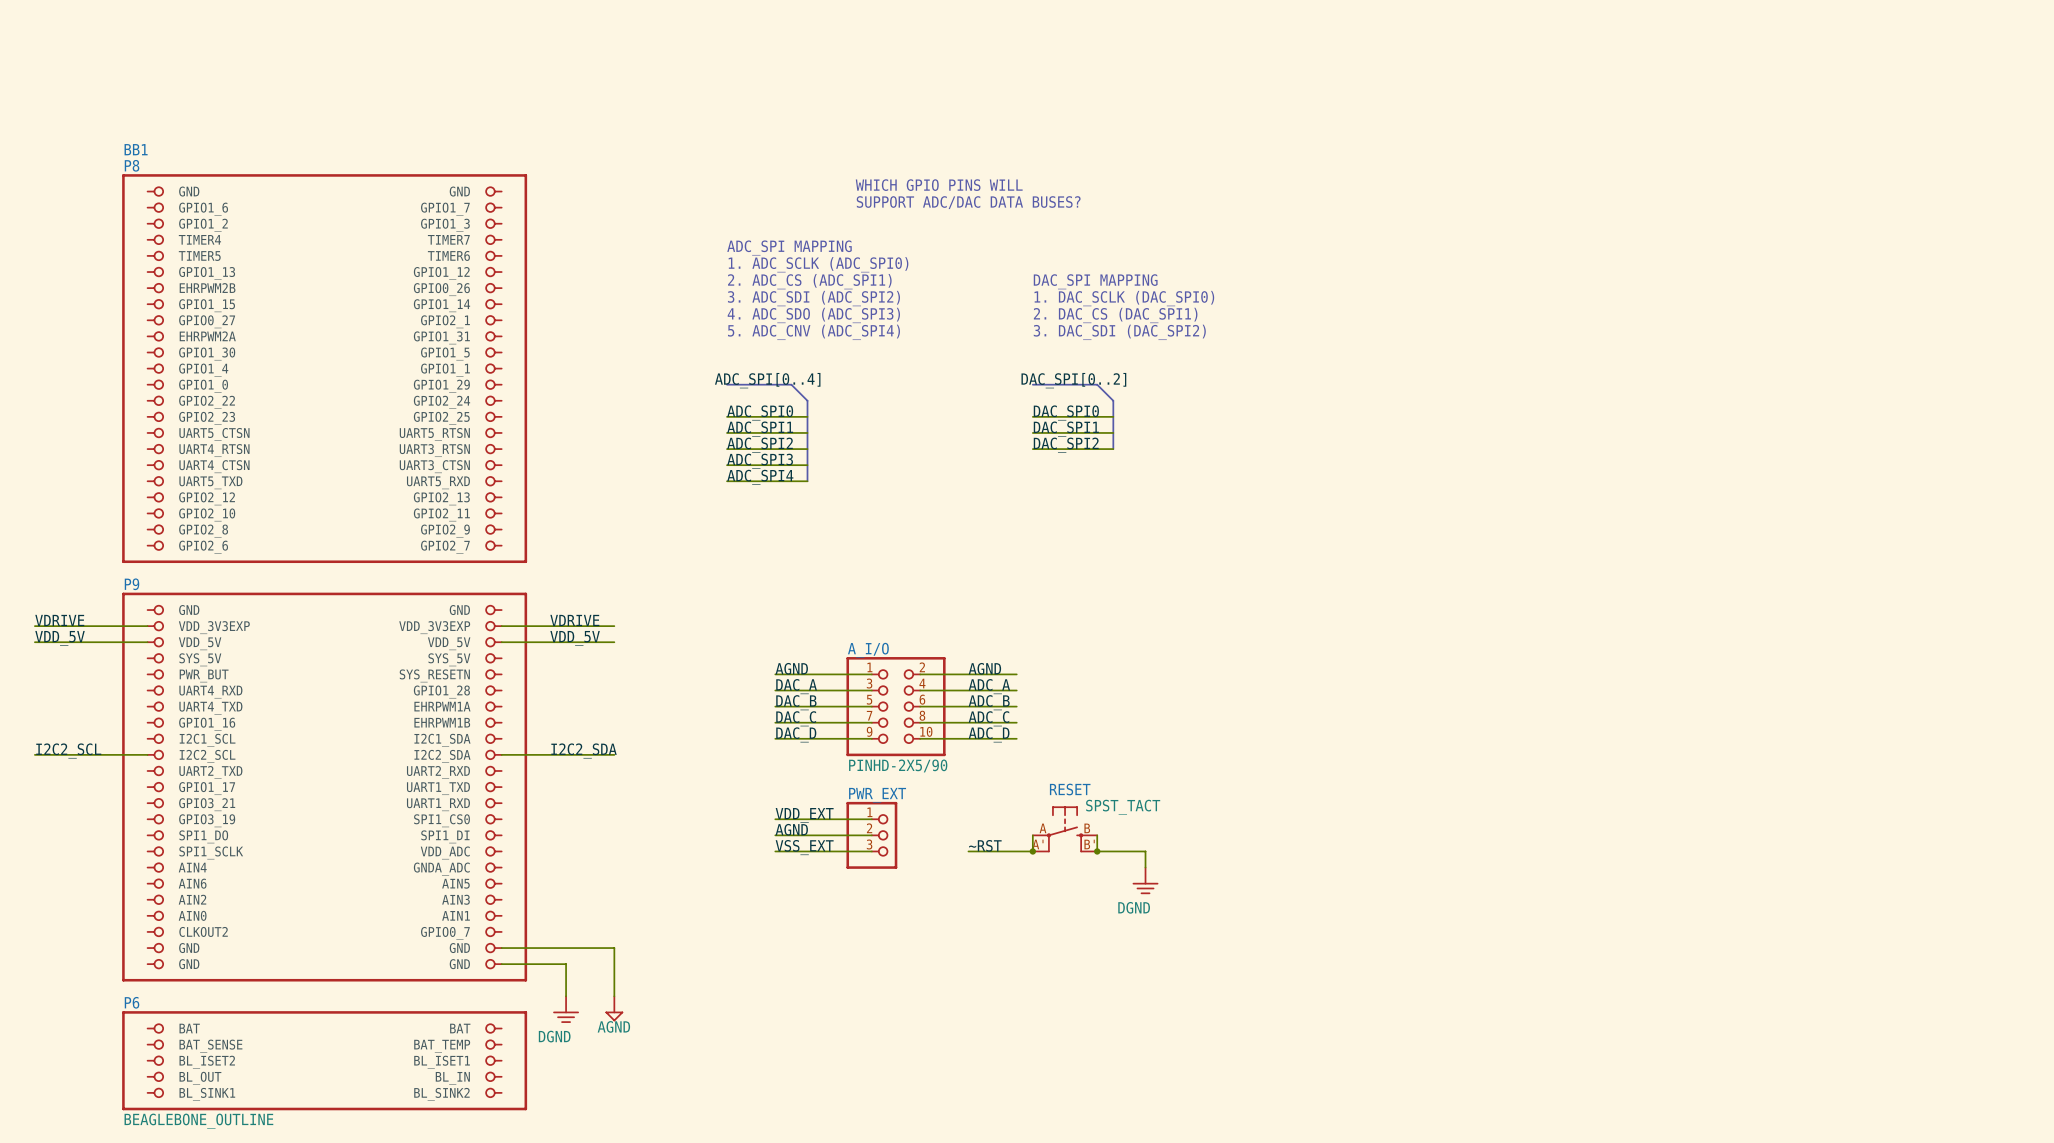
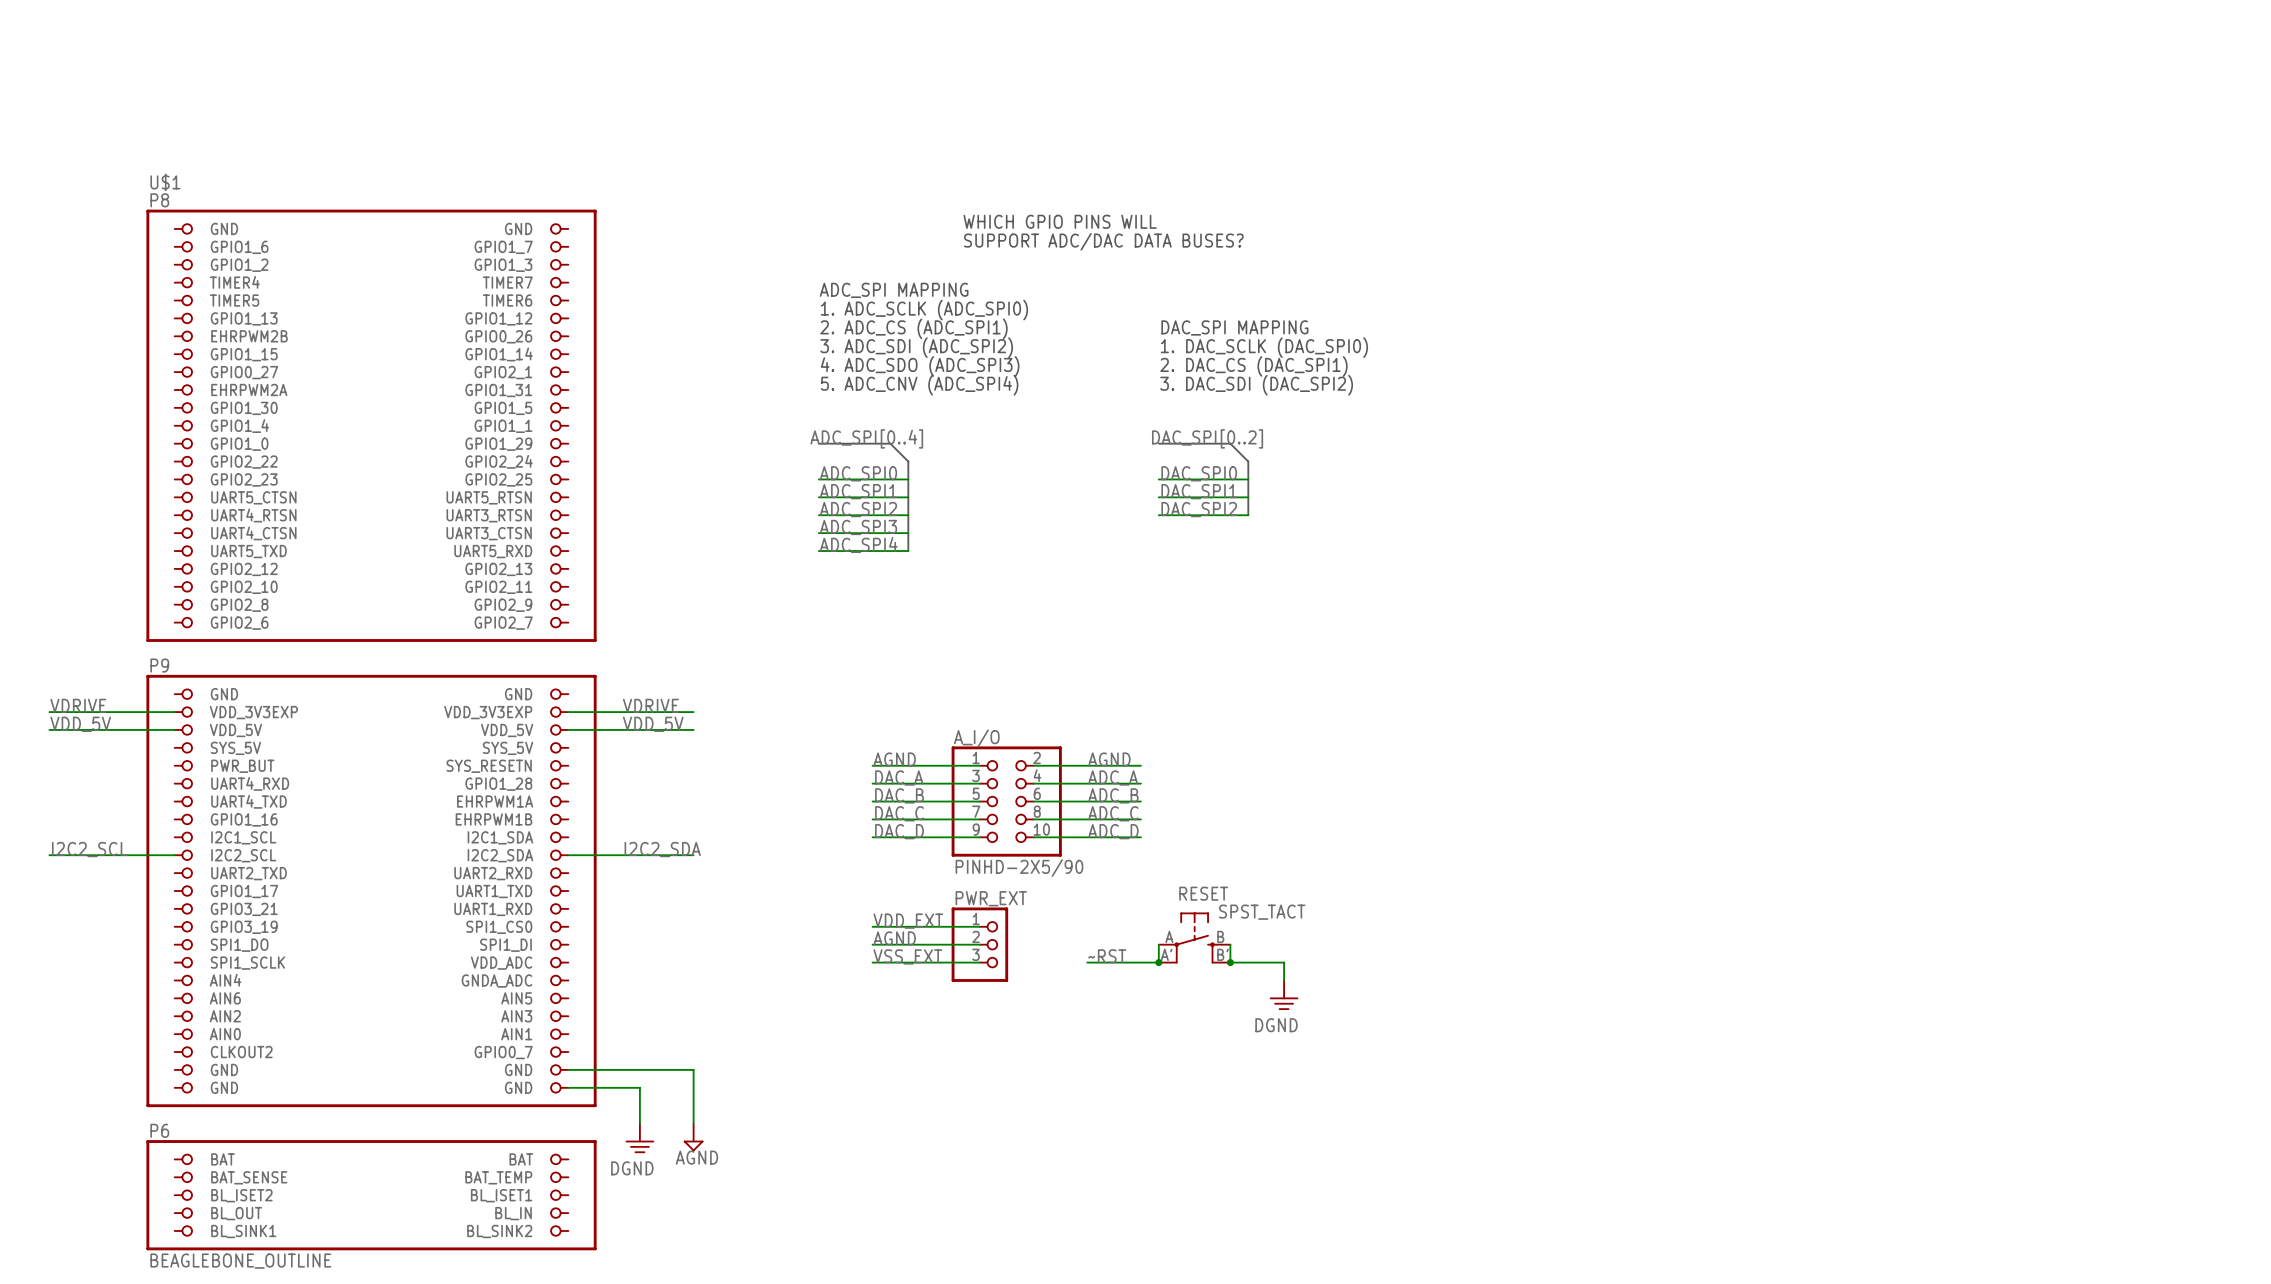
BB1 name: BB1 (136, 149) -> U$1 (165, 182)

